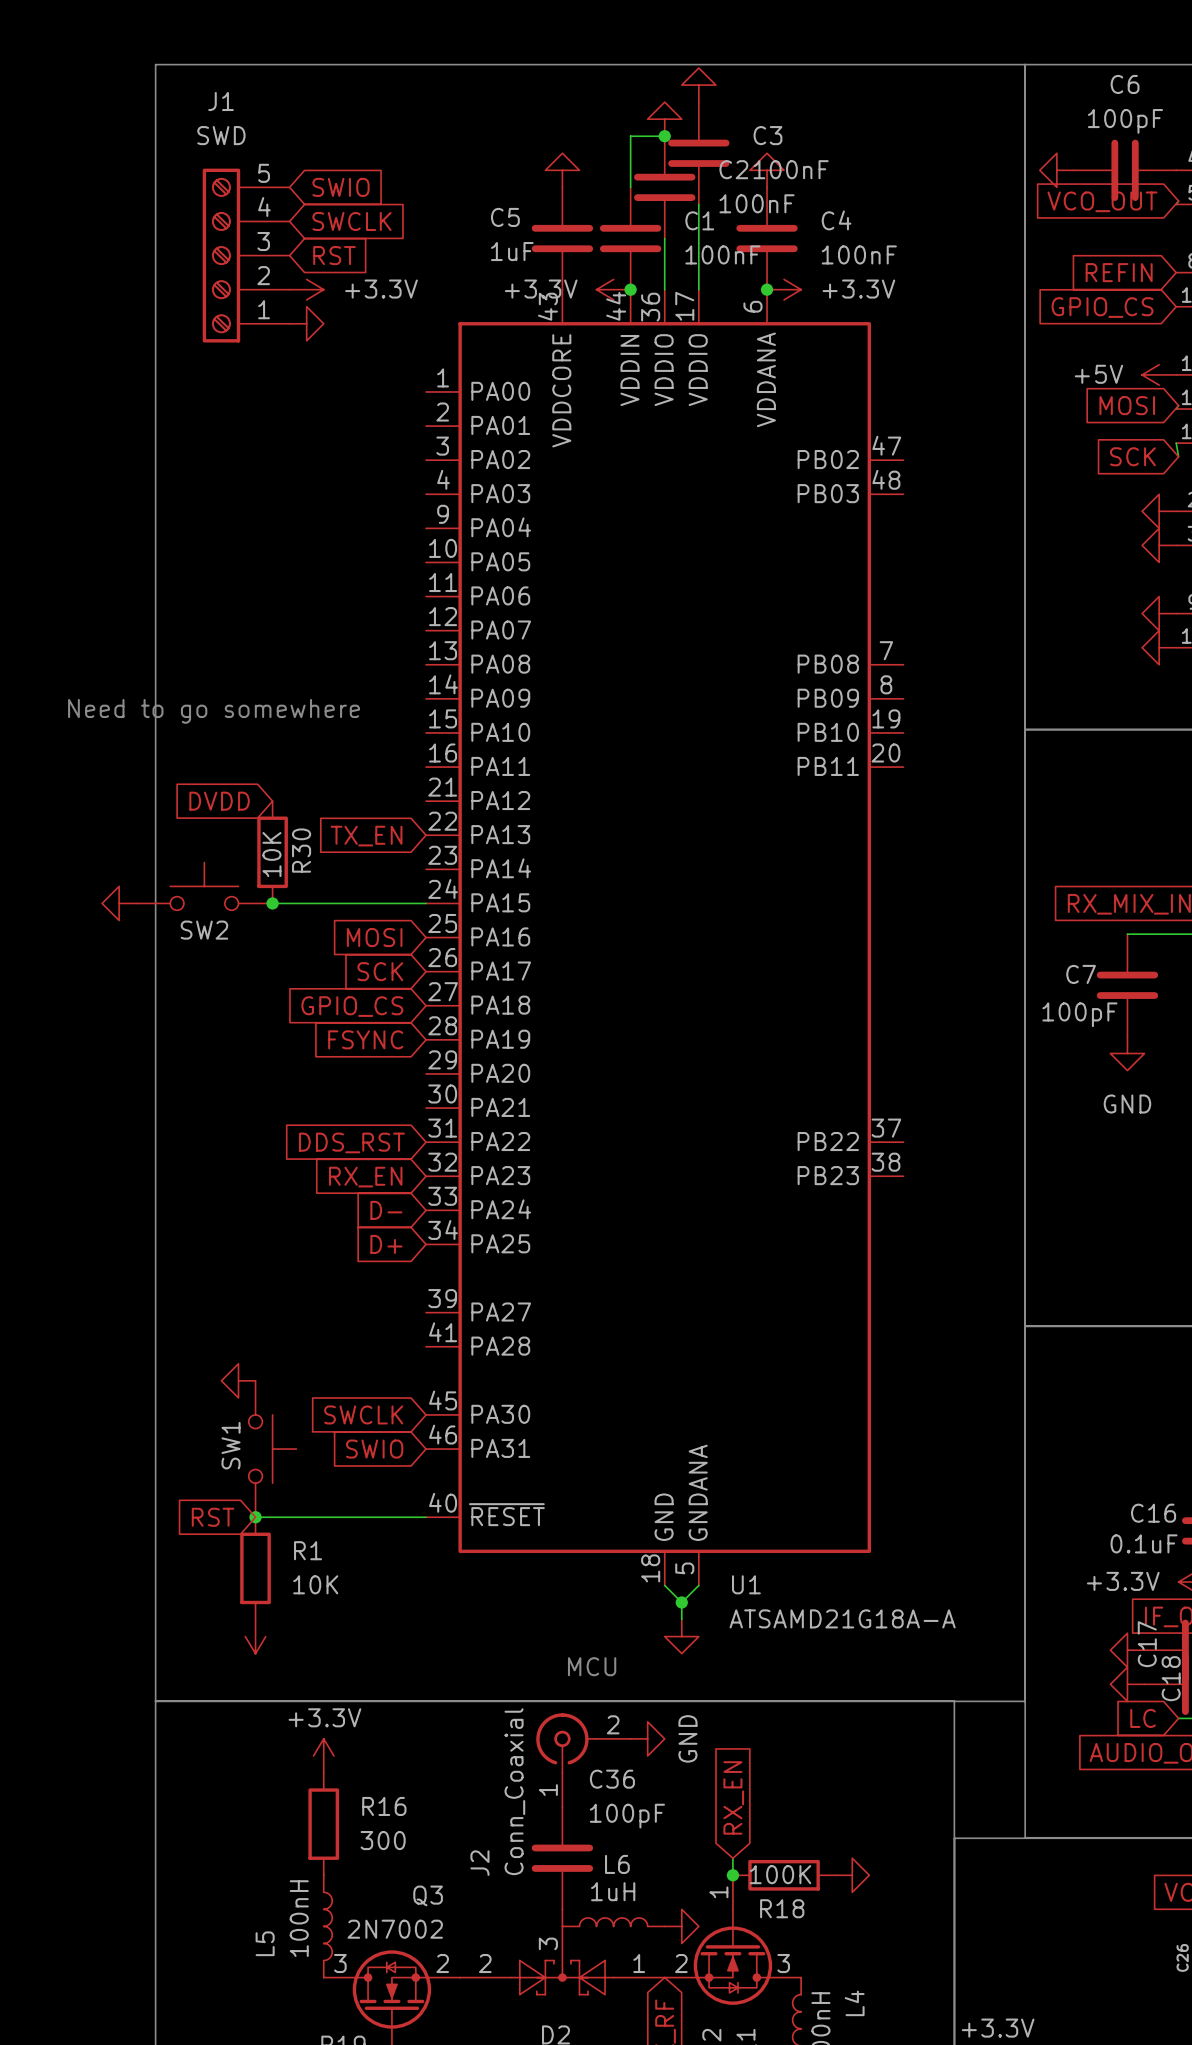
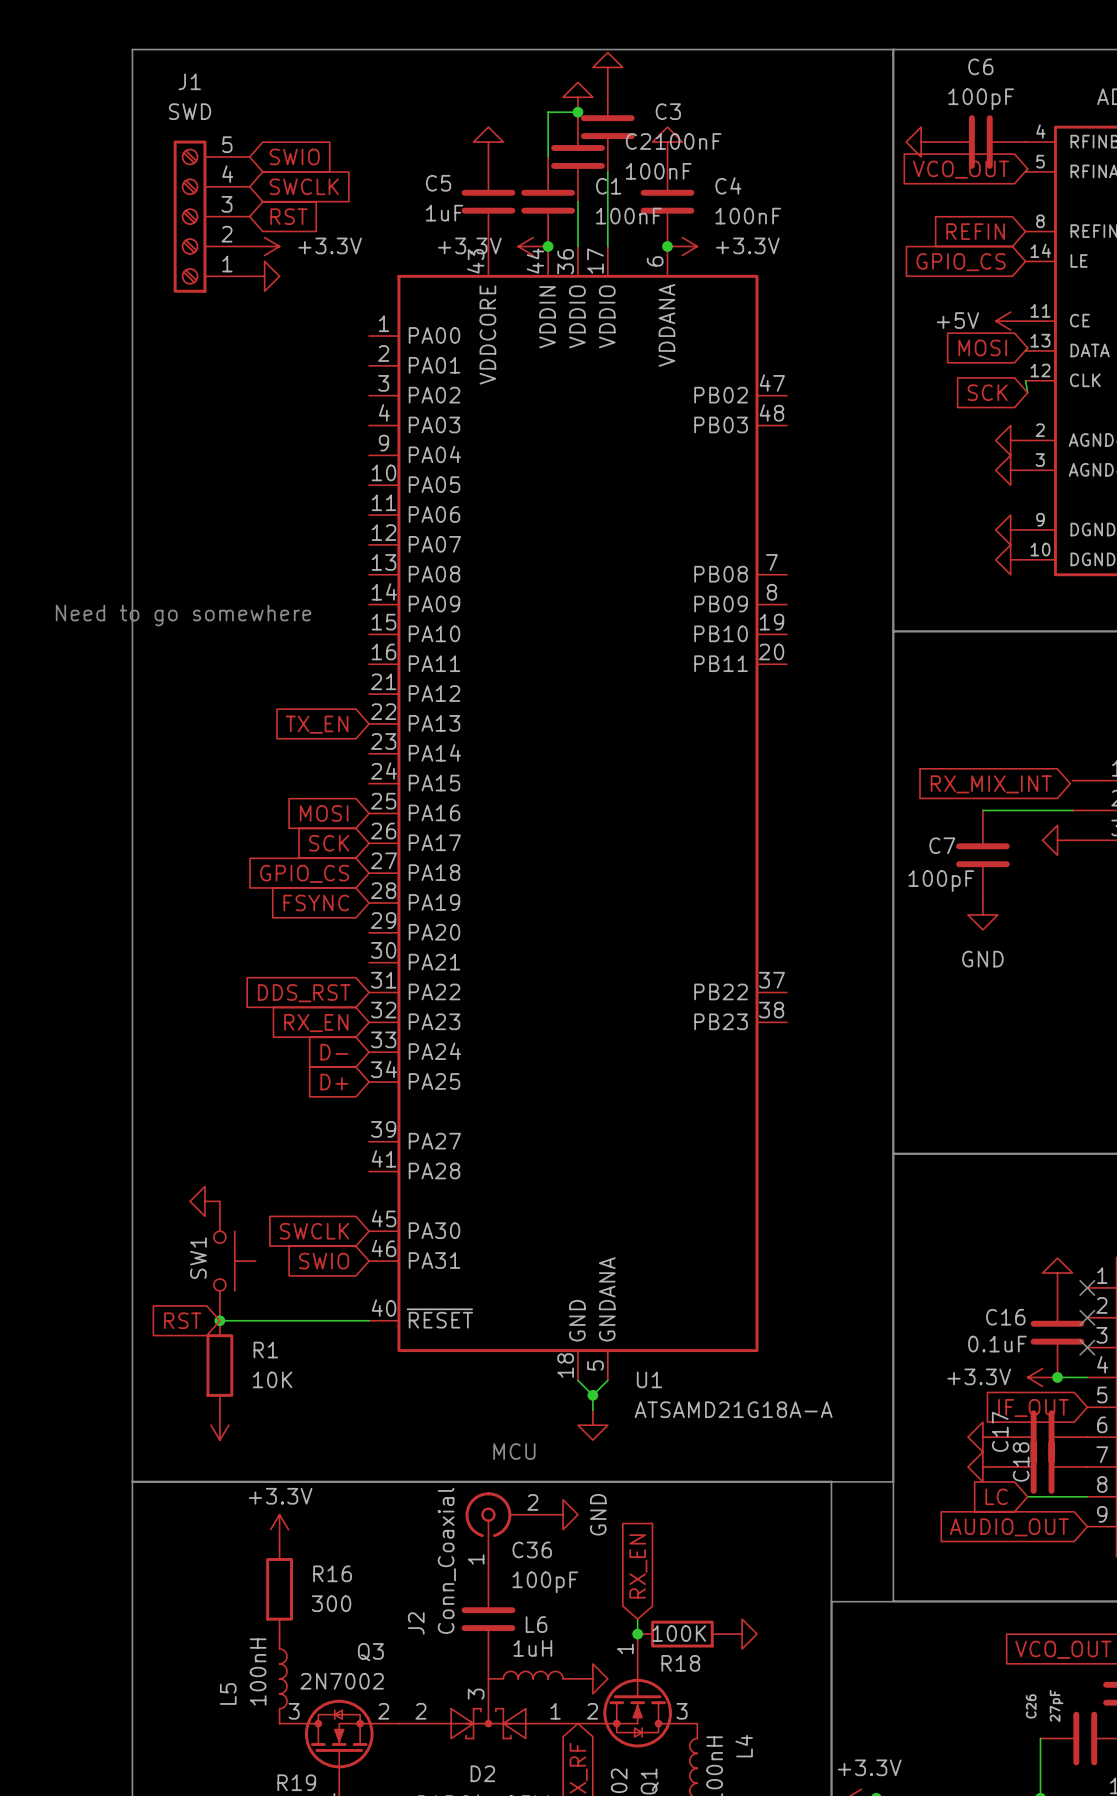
global label: DVDD (219, 801) -> none
R30: 10K (272, 852) -> none
SW2: (204, 886) -> none
power symbol: (119, 903) -> none
wire: (272, 903) (426, 903) -> none
junction: (272, 903) -> none

